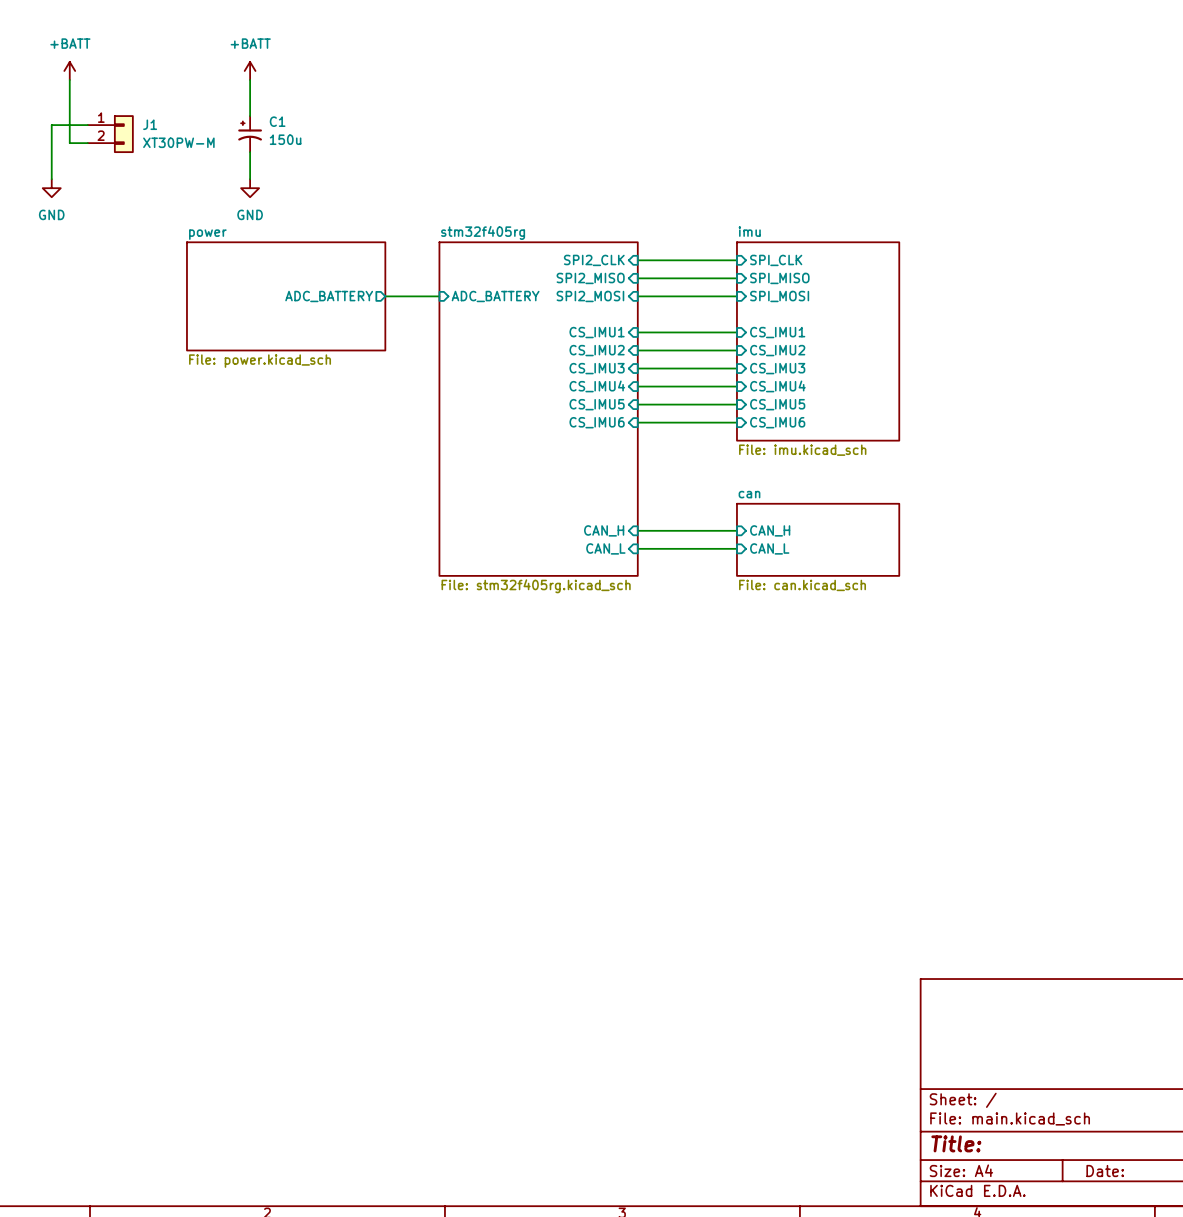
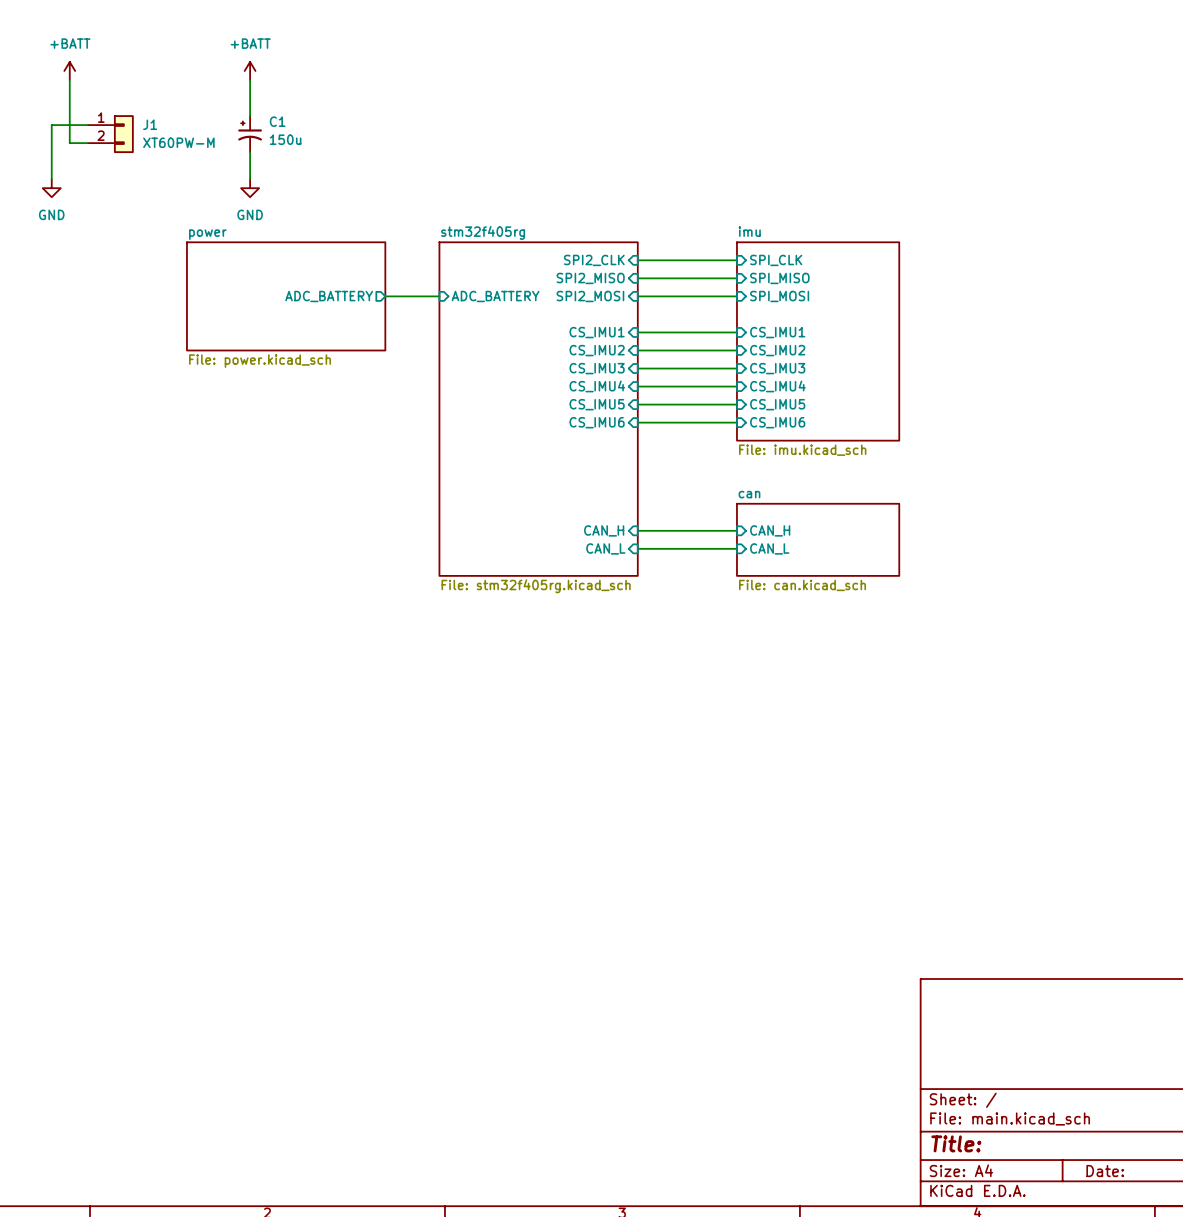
J1 value: XT30PW-M (178, 142) -> XT60PW-M (178, 142)

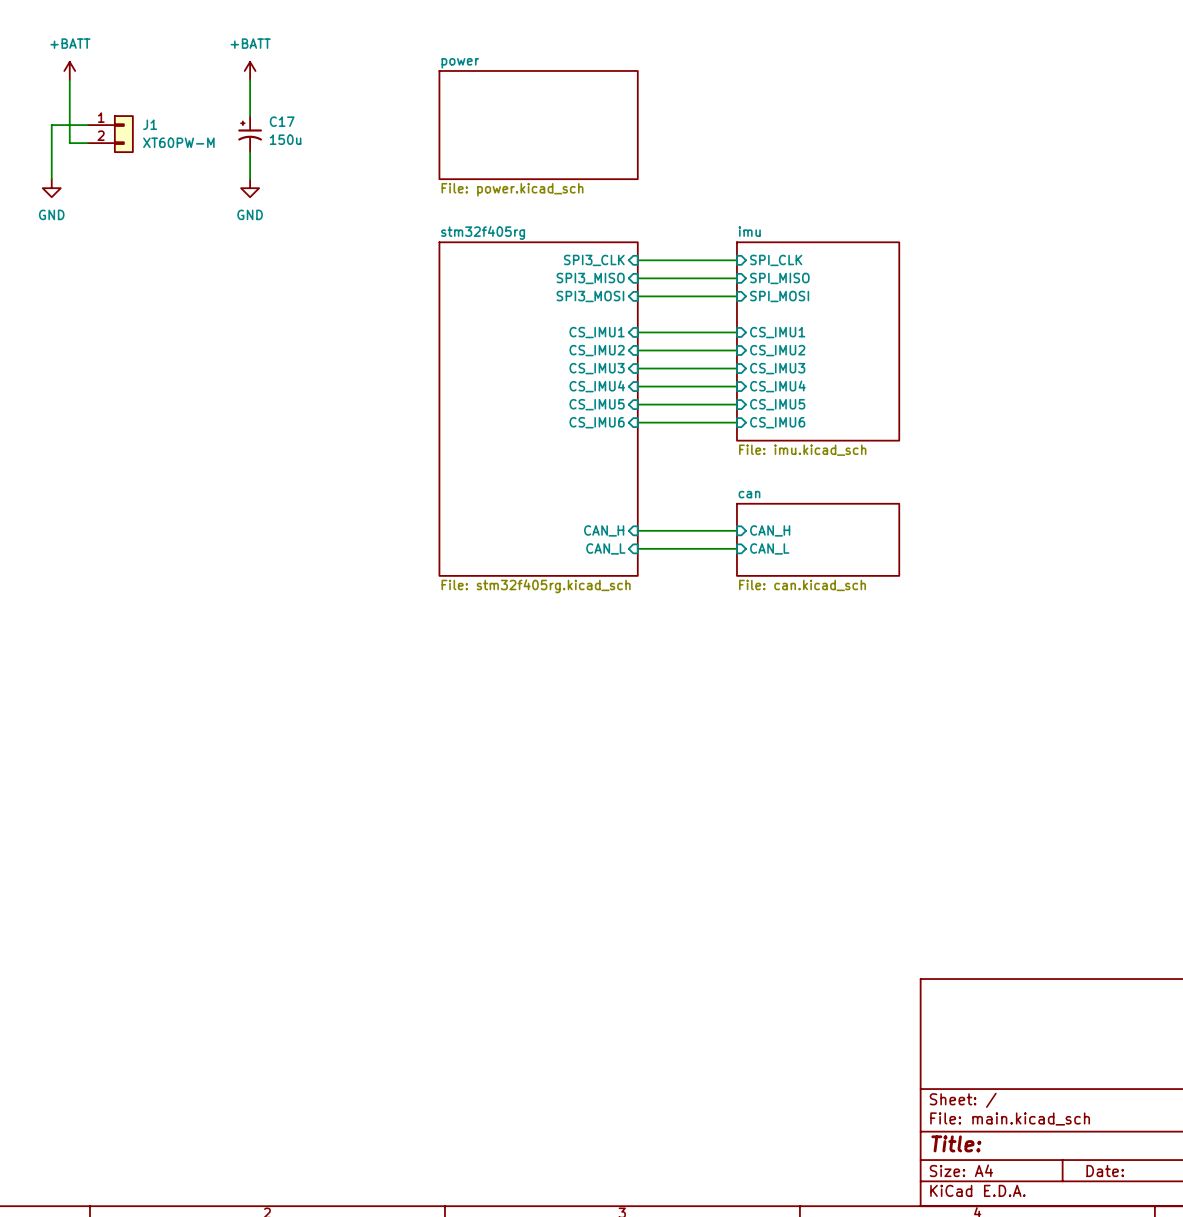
C1 name: C1 (277, 121) -> C17 (282, 121)
sheet power: none -> File: power.kicad_sch (538, 125)
sheet pin: SPI2_CLK (594, 260) -> SPI3_CLK (594, 260)
sheet pin: SPI2_MISO (590, 278) -> SPI3_MISO (590, 278)
sheet power: File: power.kicad_sch (286, 296) -> none
sheet pin: ADC_BATTERY (329, 296) -> none
wire: (385, 296) (439, 296) -> none
sheet pin: ADC_BATTERY (495, 296) -> none
sheet pin: SPI2_MOSI (590, 296) -> SPI3_MOSI (590, 296)

